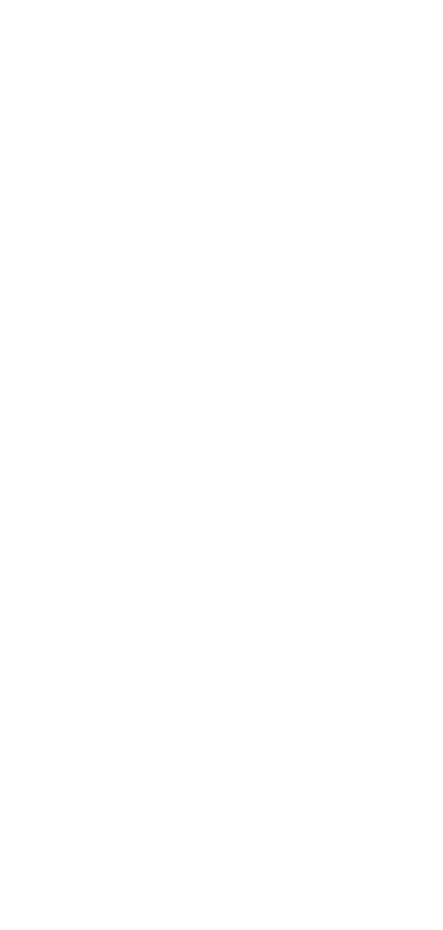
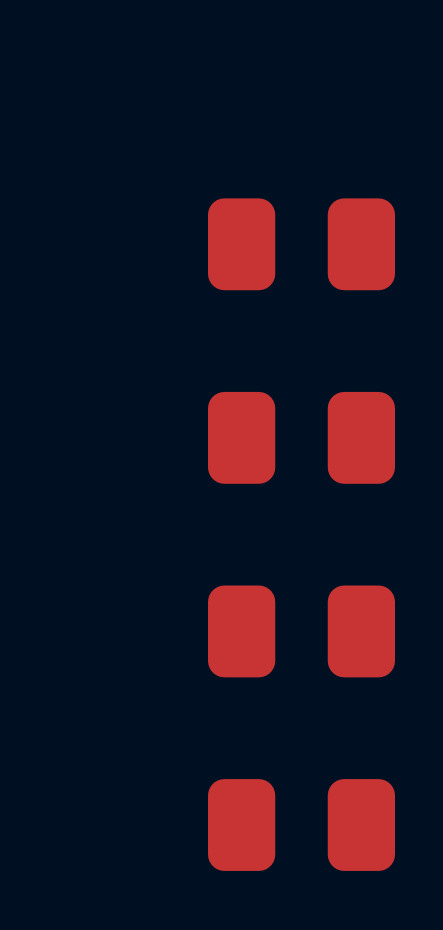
part: none -> (301, 244)
part: none -> (301, 437)
part: none -> (301, 631)
part: none -> (301, 825)

